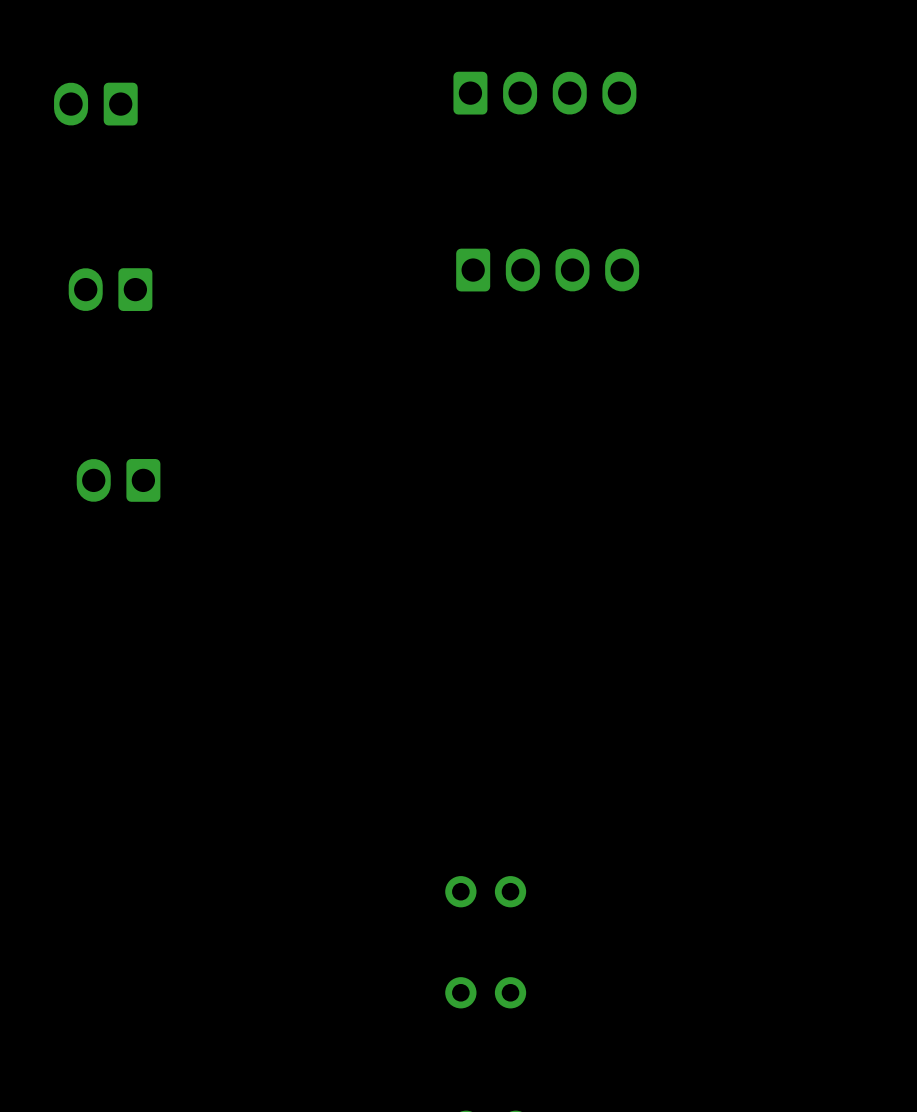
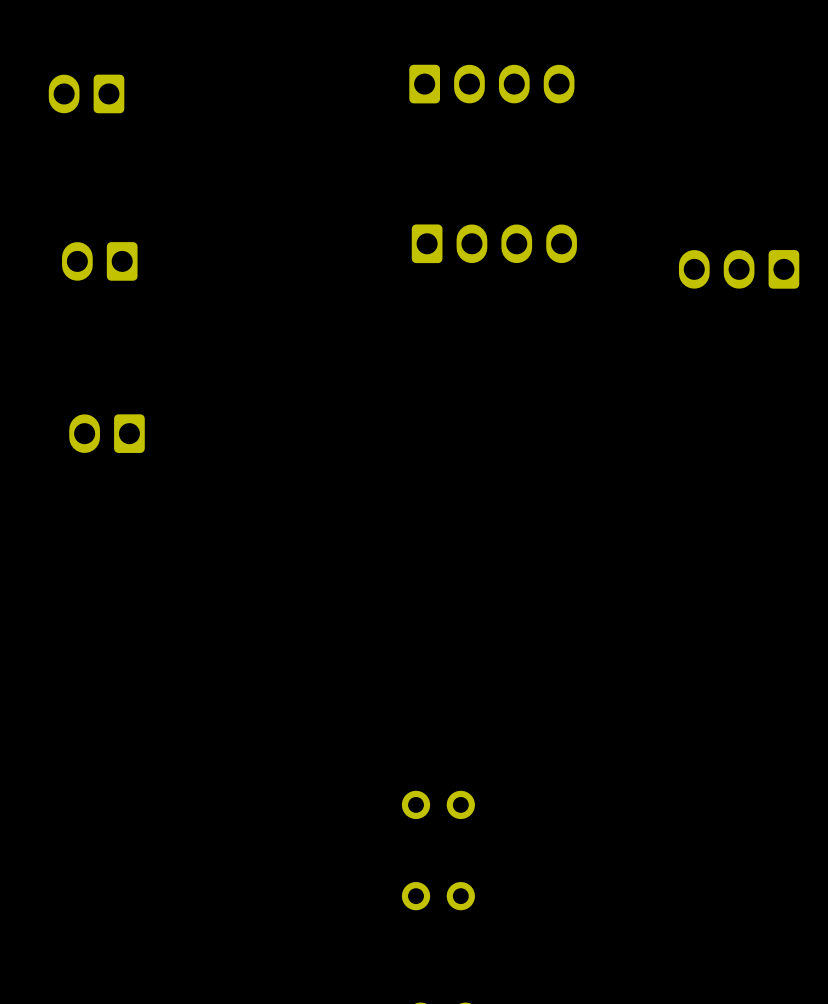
part: none -> (739, 269)

